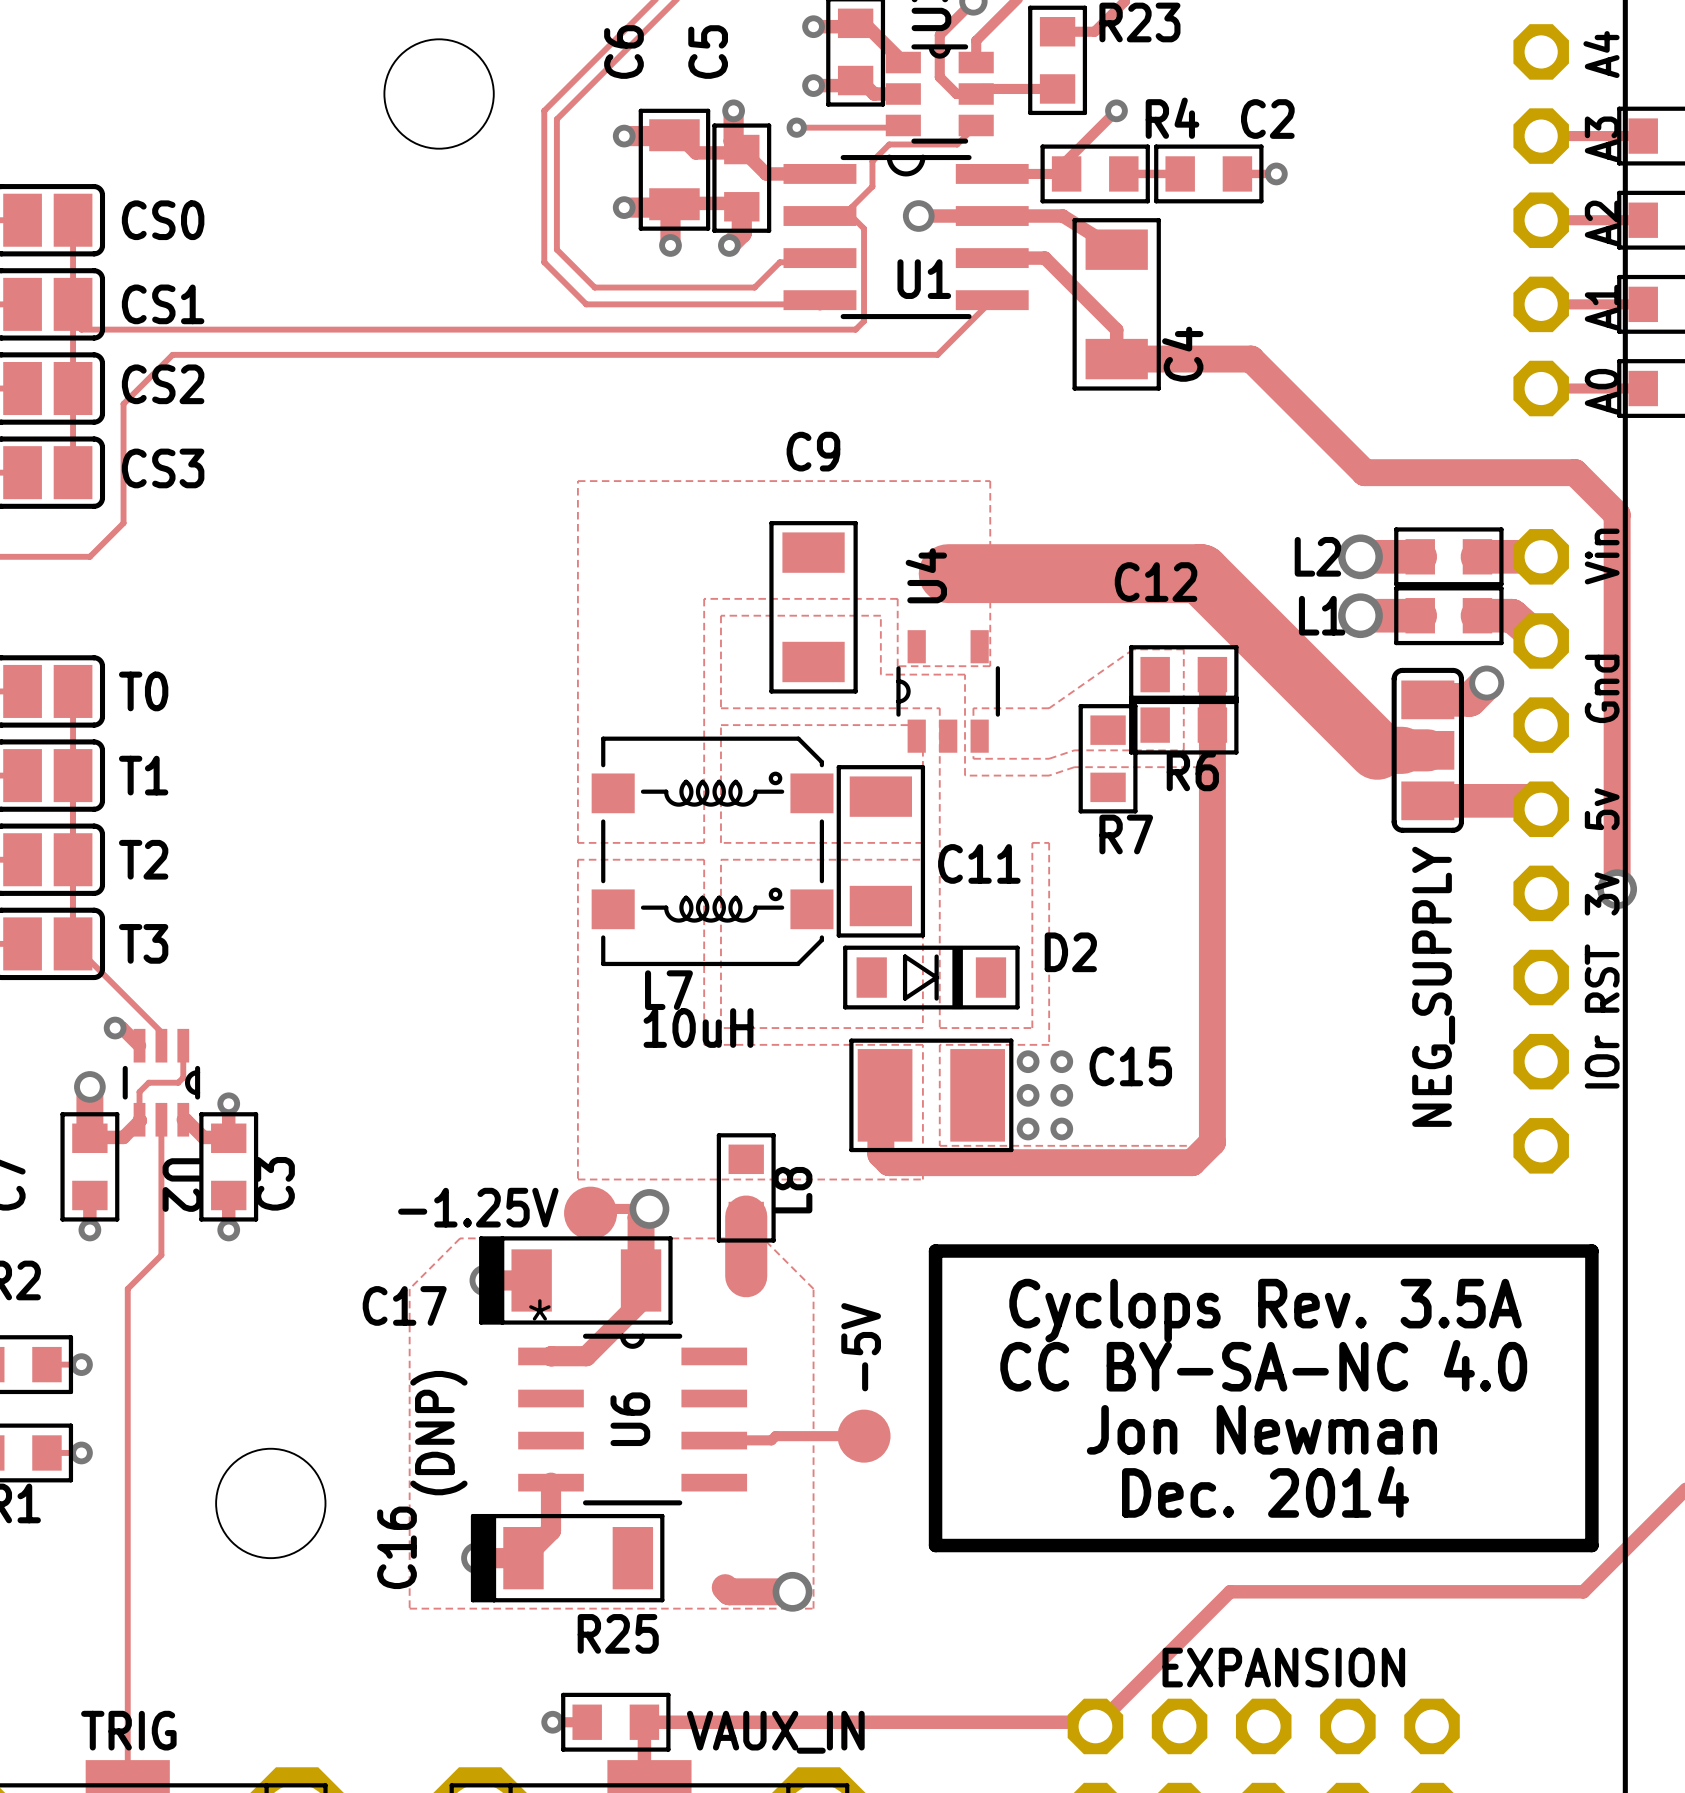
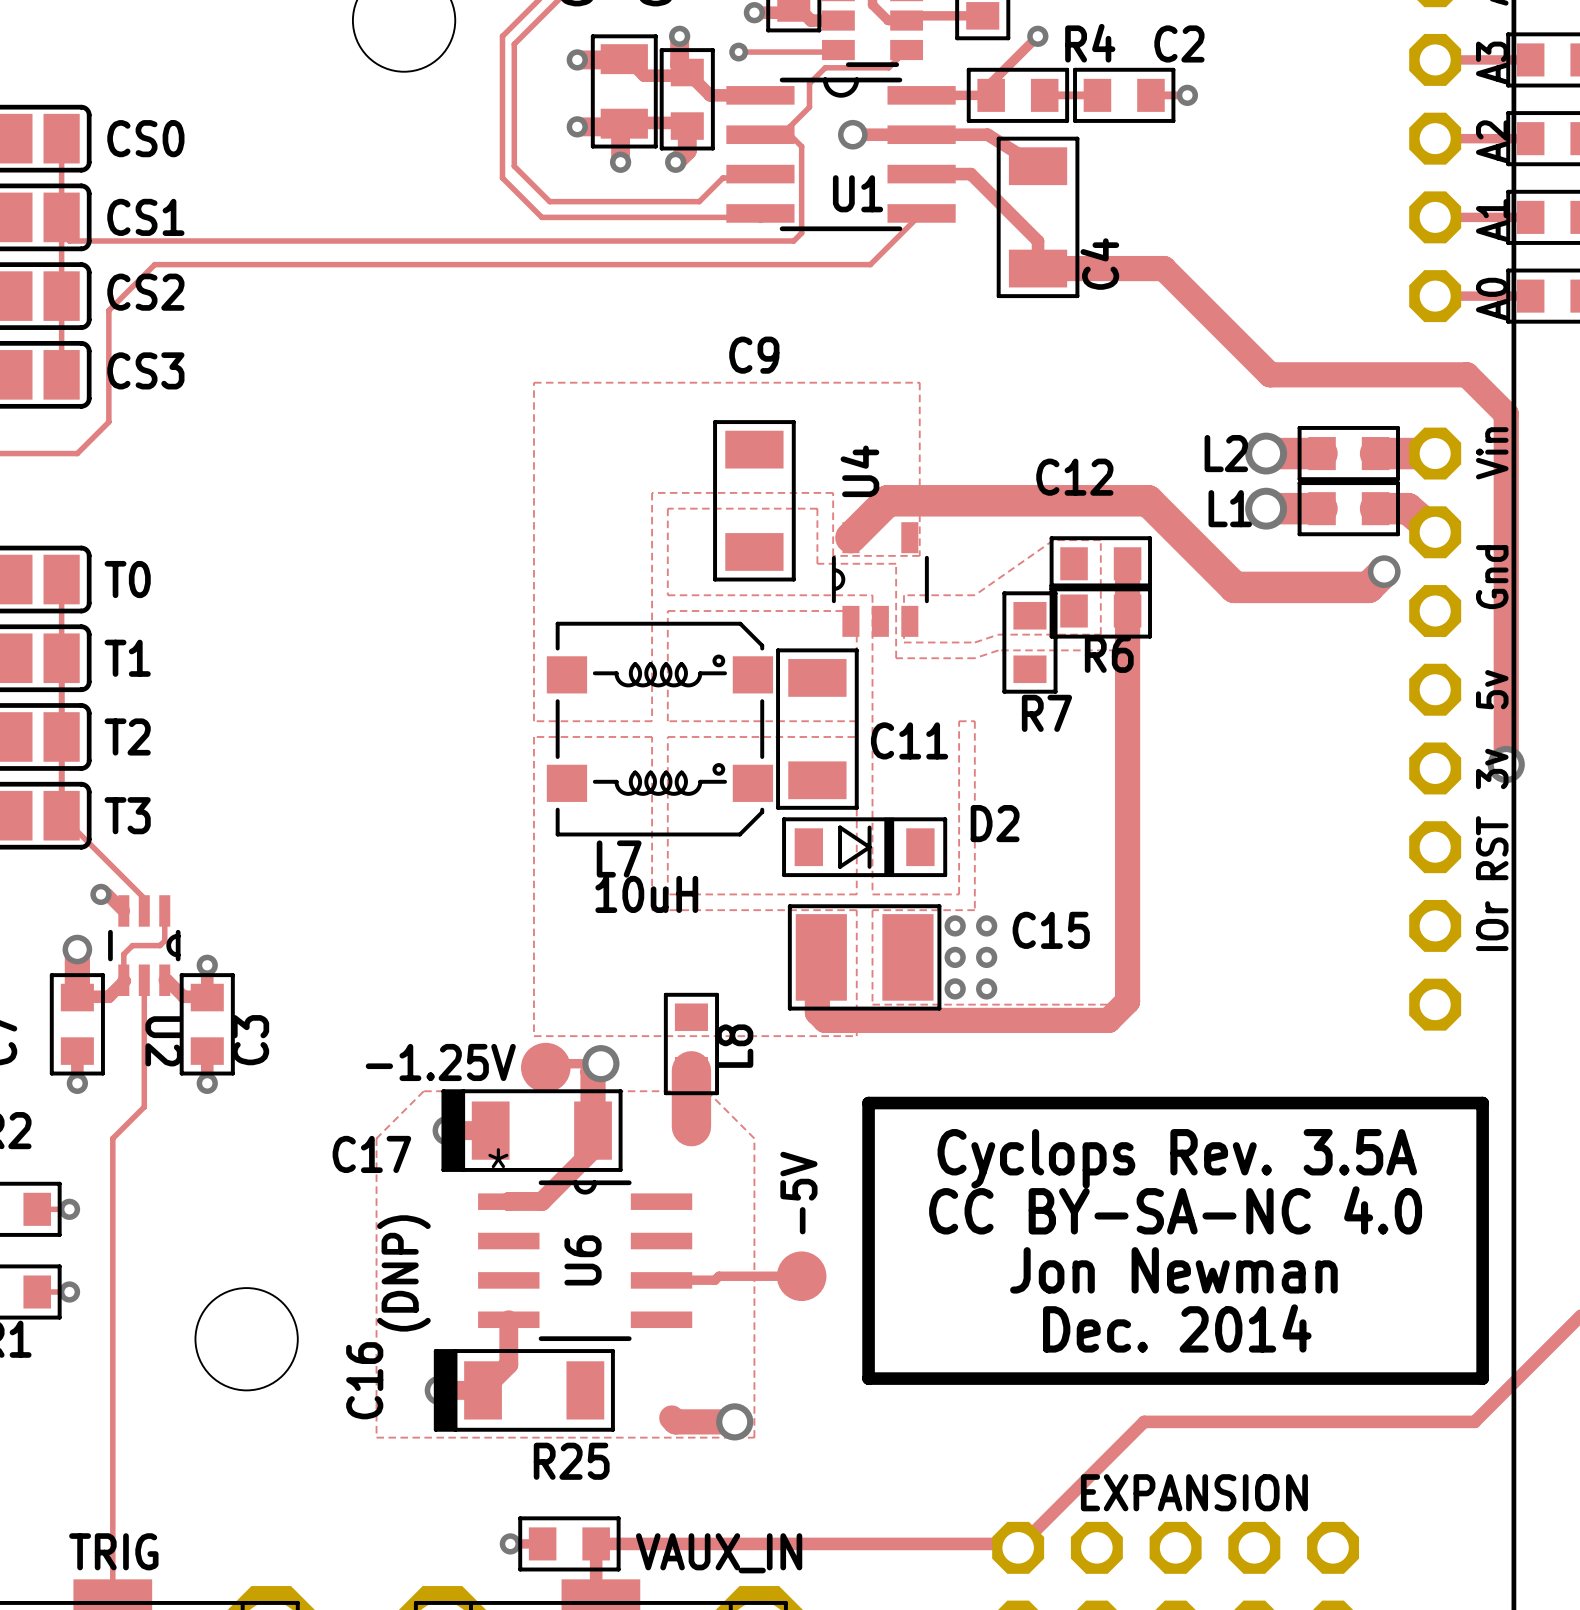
track: (948, 573) (1200, 573) (1234, 607) -> (850, 537) (887, 500) (1148, 500)
track width: thick (1234, 607) (1326, 699) -> thin (1148, 500) (1234, 587)
track: (1326, 699) (1377, 750) (1427, 750) -> (1234, 587) (1329, 587)
NEG_SUPPLY: (1427, 750) -> none
track: (1427, 800) (1532, 800) (1541, 809) -> none

